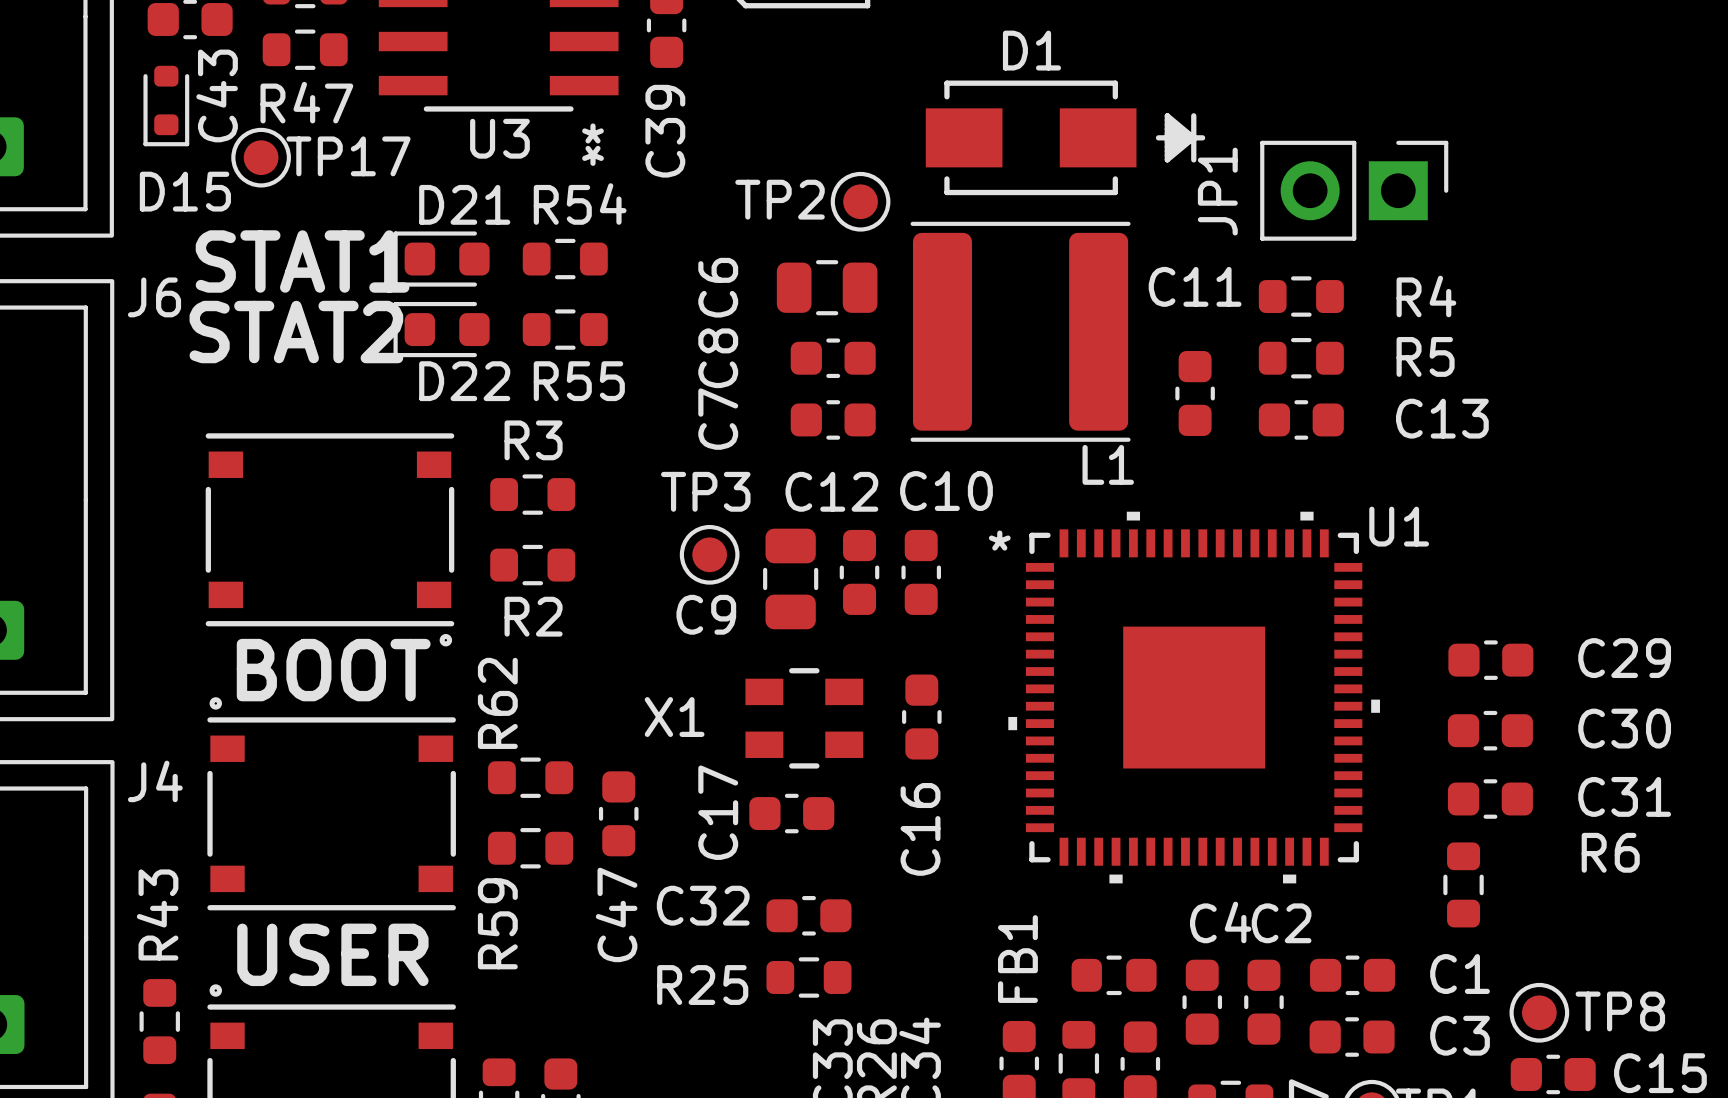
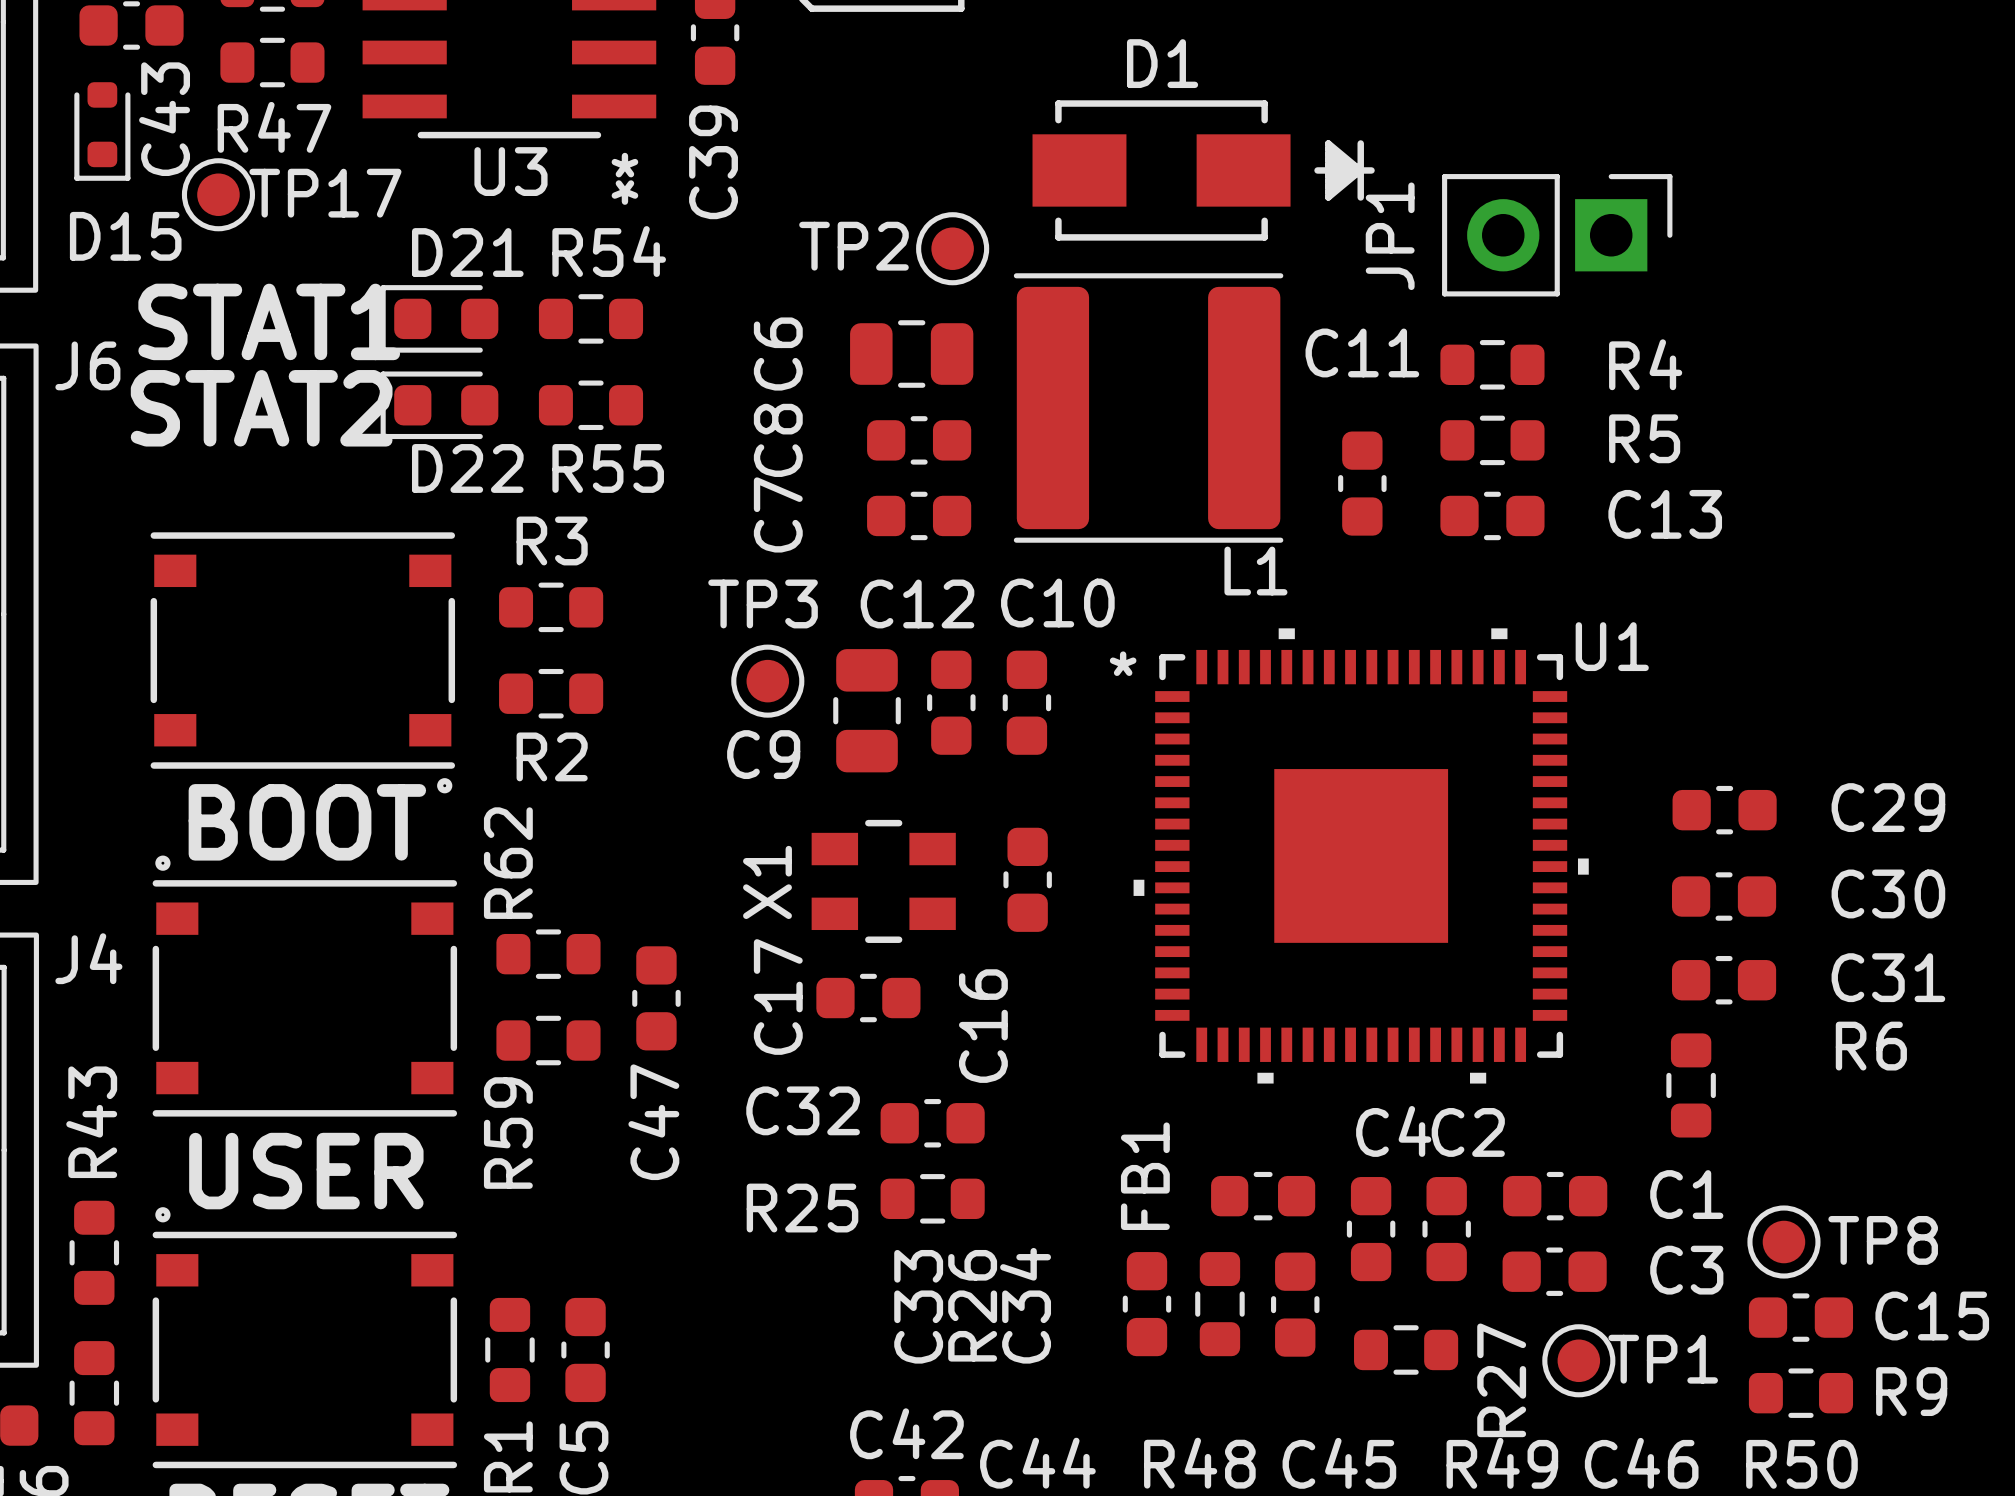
X1 name rotation: 0° (674, 717) -> 90° counterclockwise (767, 882)
C16 name position: C16 (920, 829) -> C16 (983, 1026)
C32 position: (808, 915) -> (932, 1123)
R25 position: (808, 977) -> (932, 1198)

